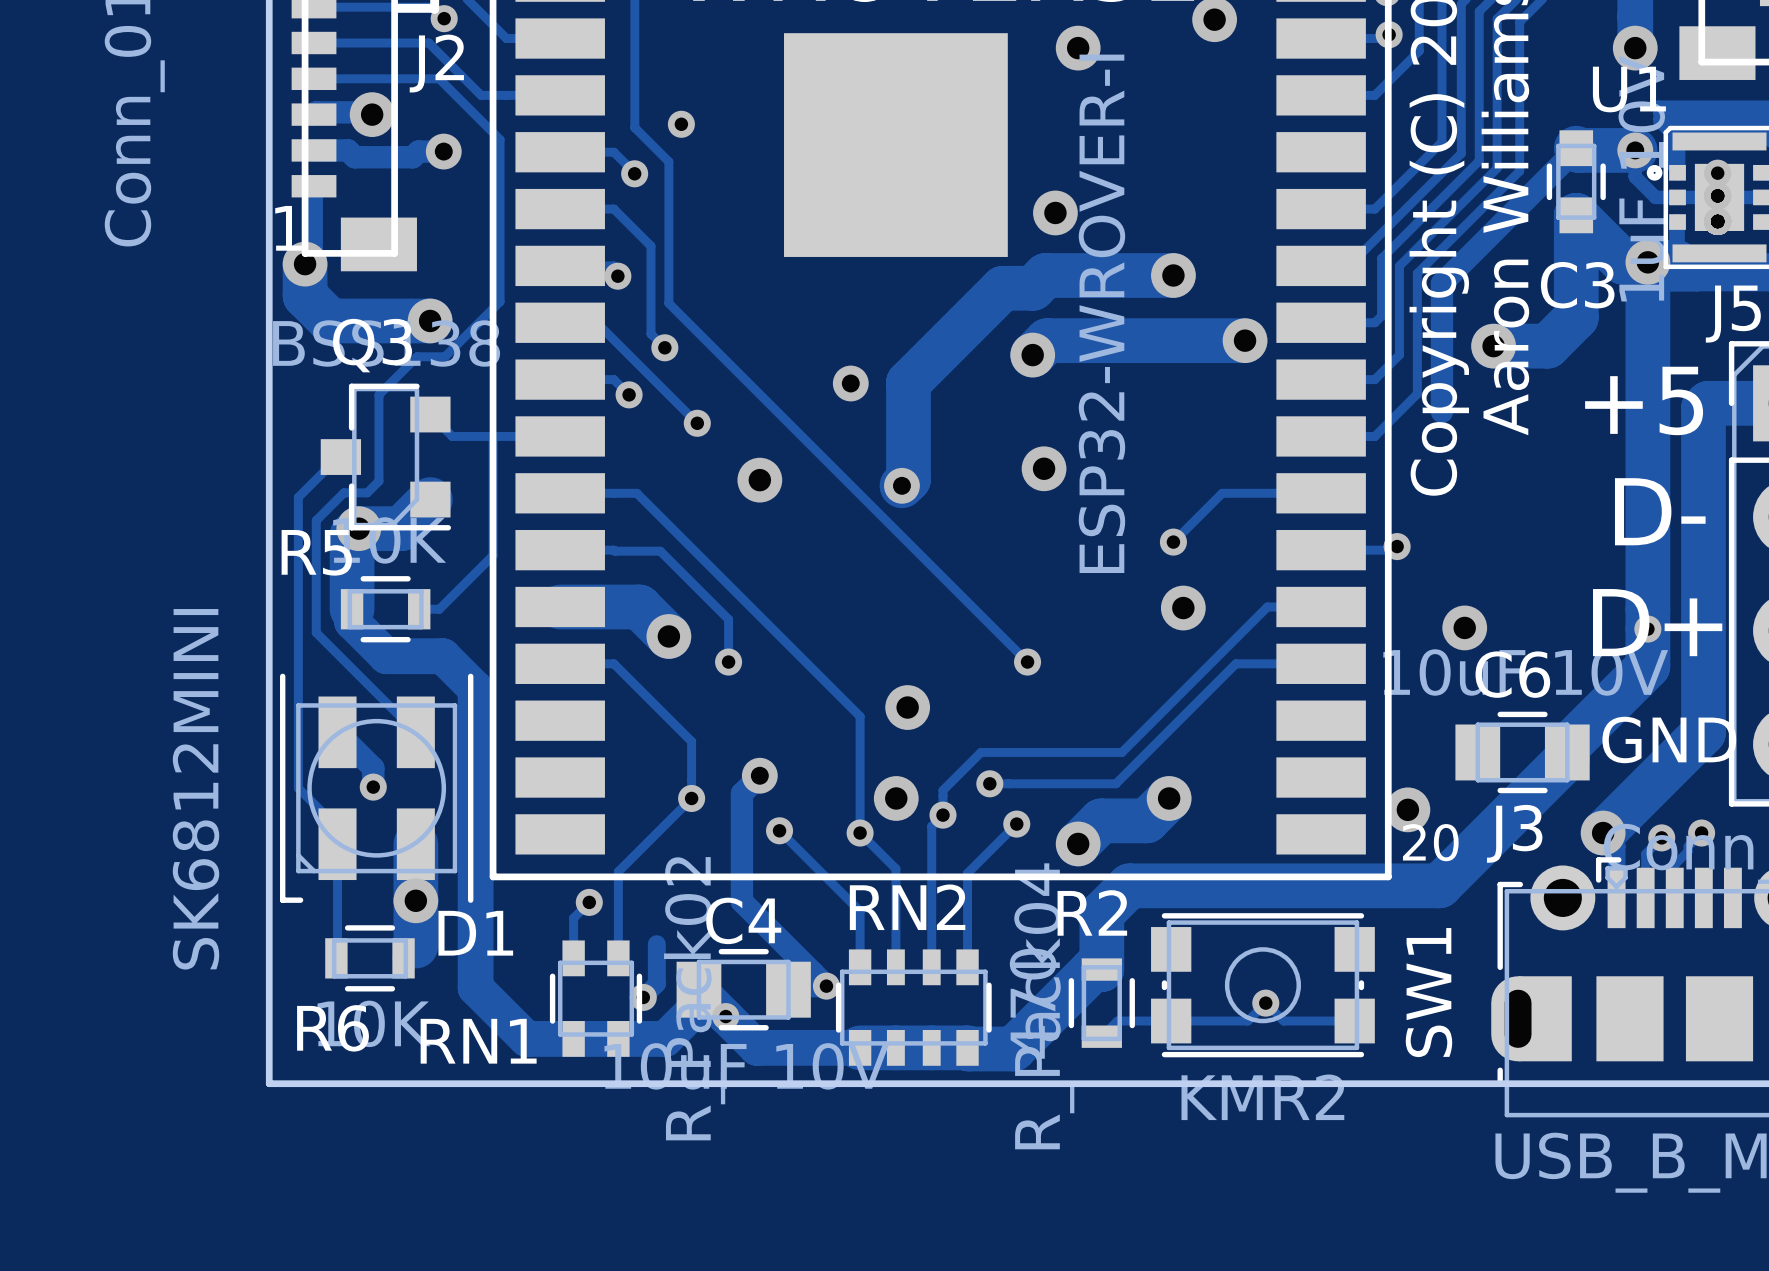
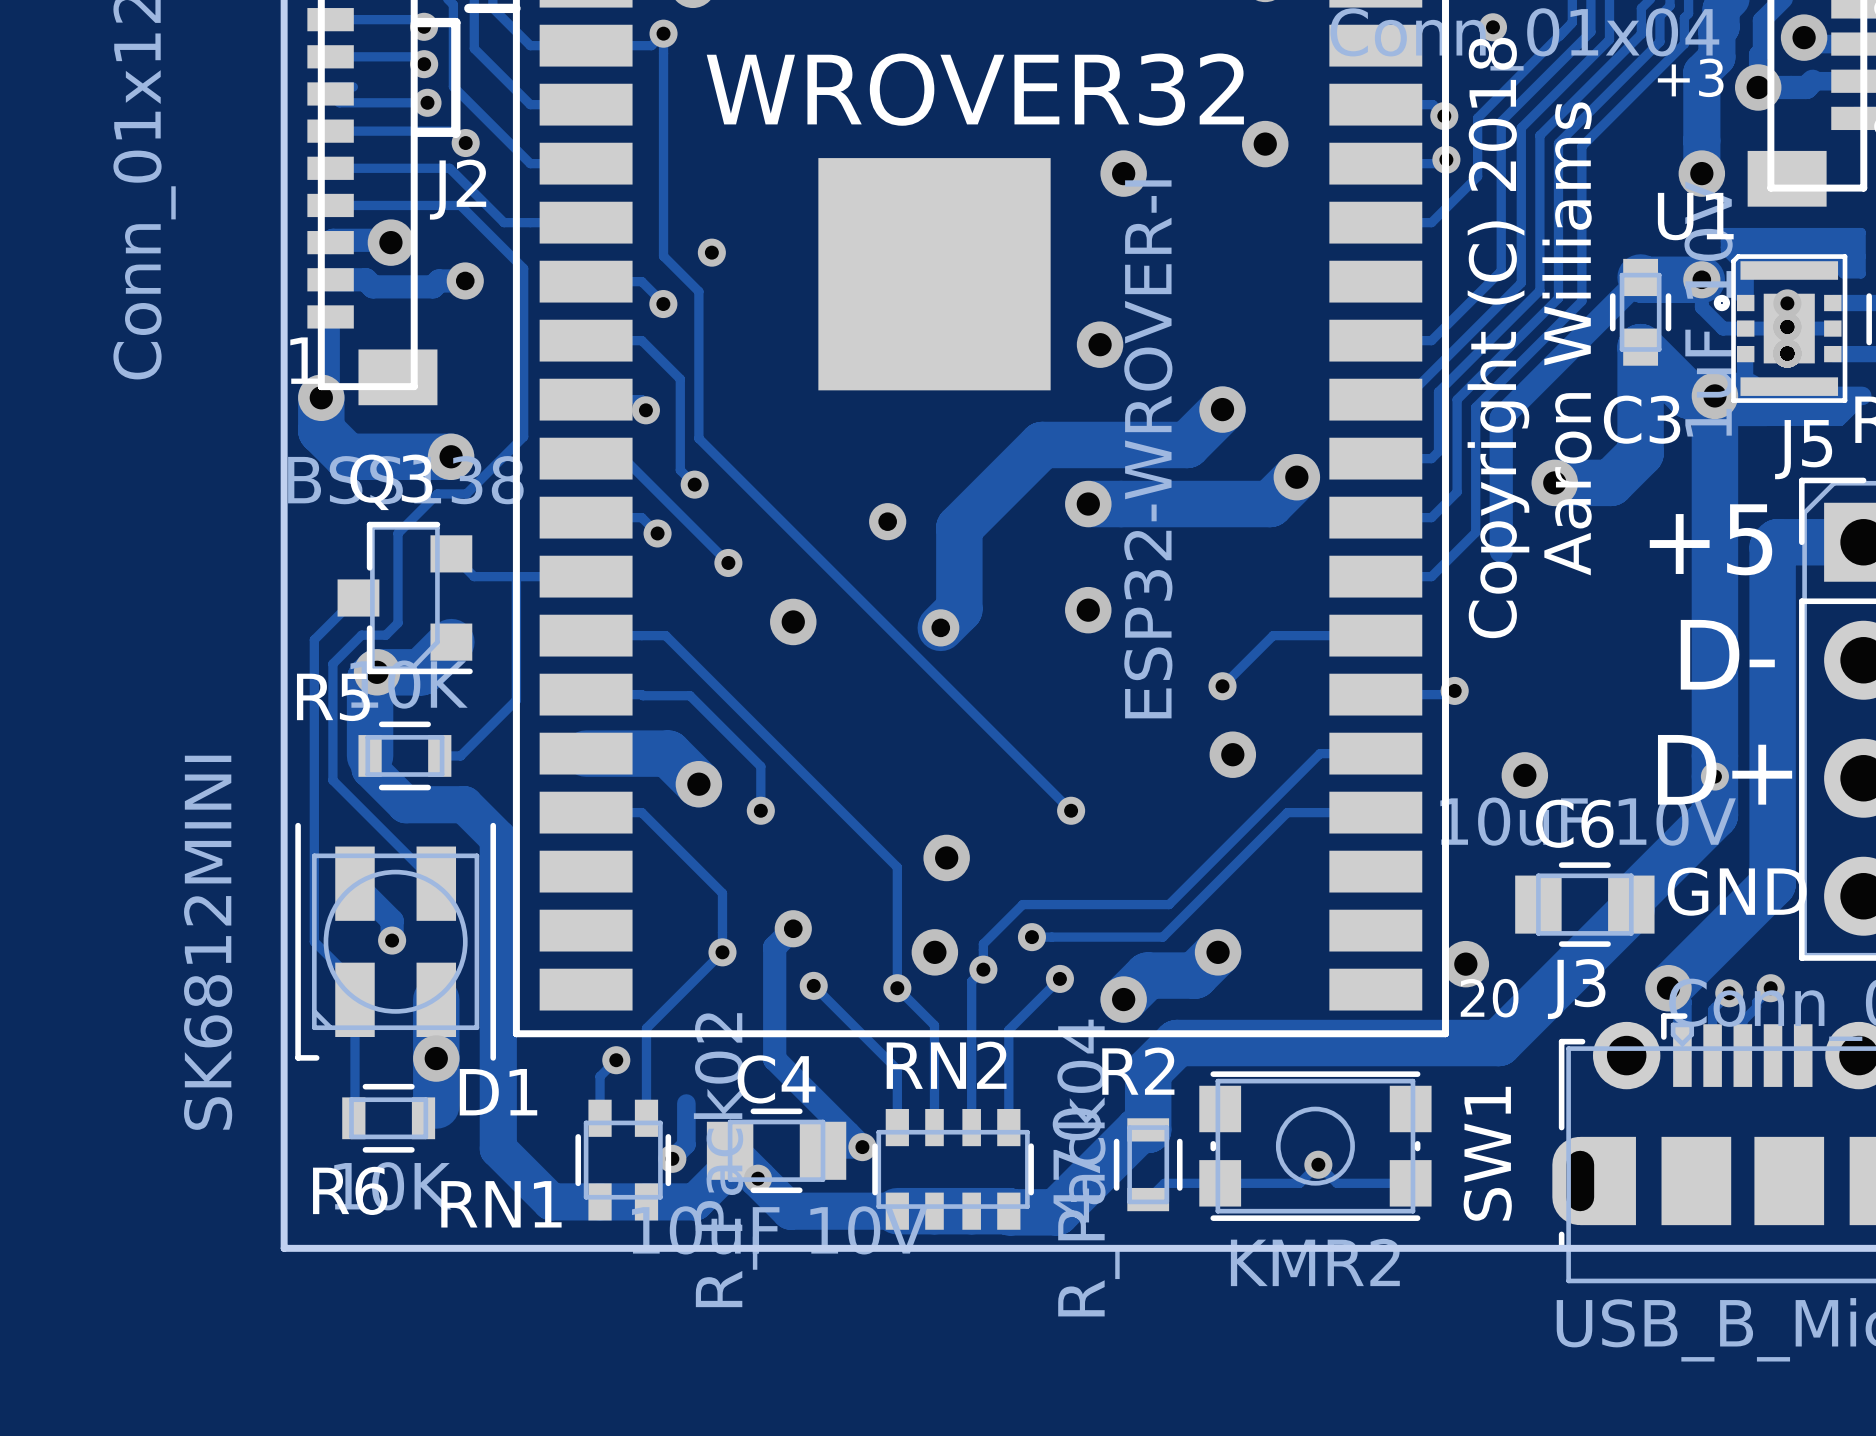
track: (1173, 275) (1045, 275) (1032, 288) (1002, 288) (908, 382) (908, 479) -> (1222, 409) (1187, 444) (1042, 444) (959, 527) (959, 609) (947, 621)
track: (1245, 340) (1047, 340) (1032, 355) -> (1296, 477) (1270, 504) (1088, 504)
via position: (1032, 355) -> (1088, 504)

